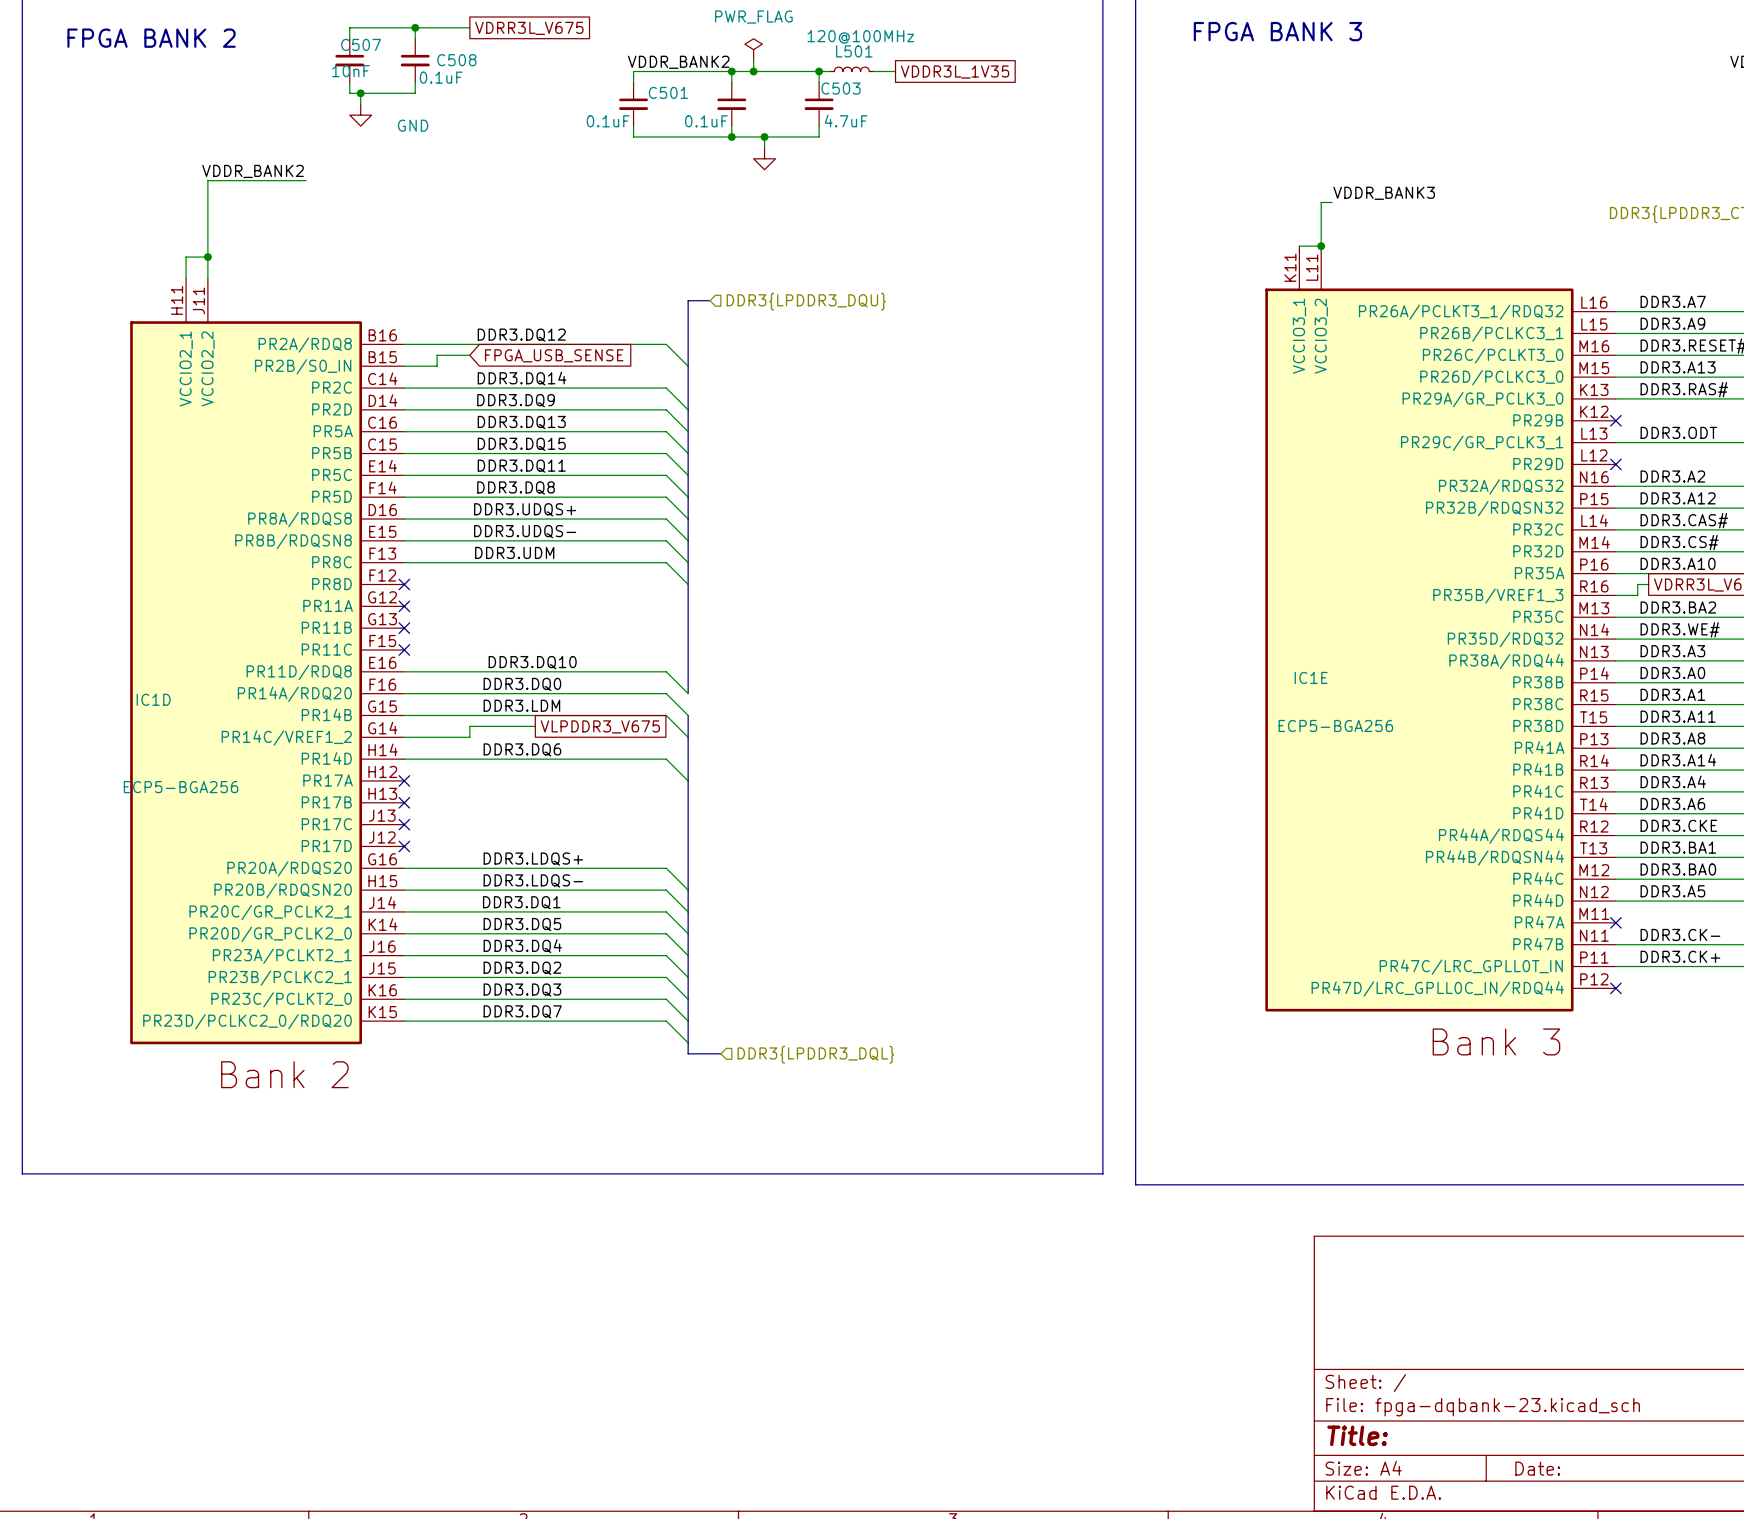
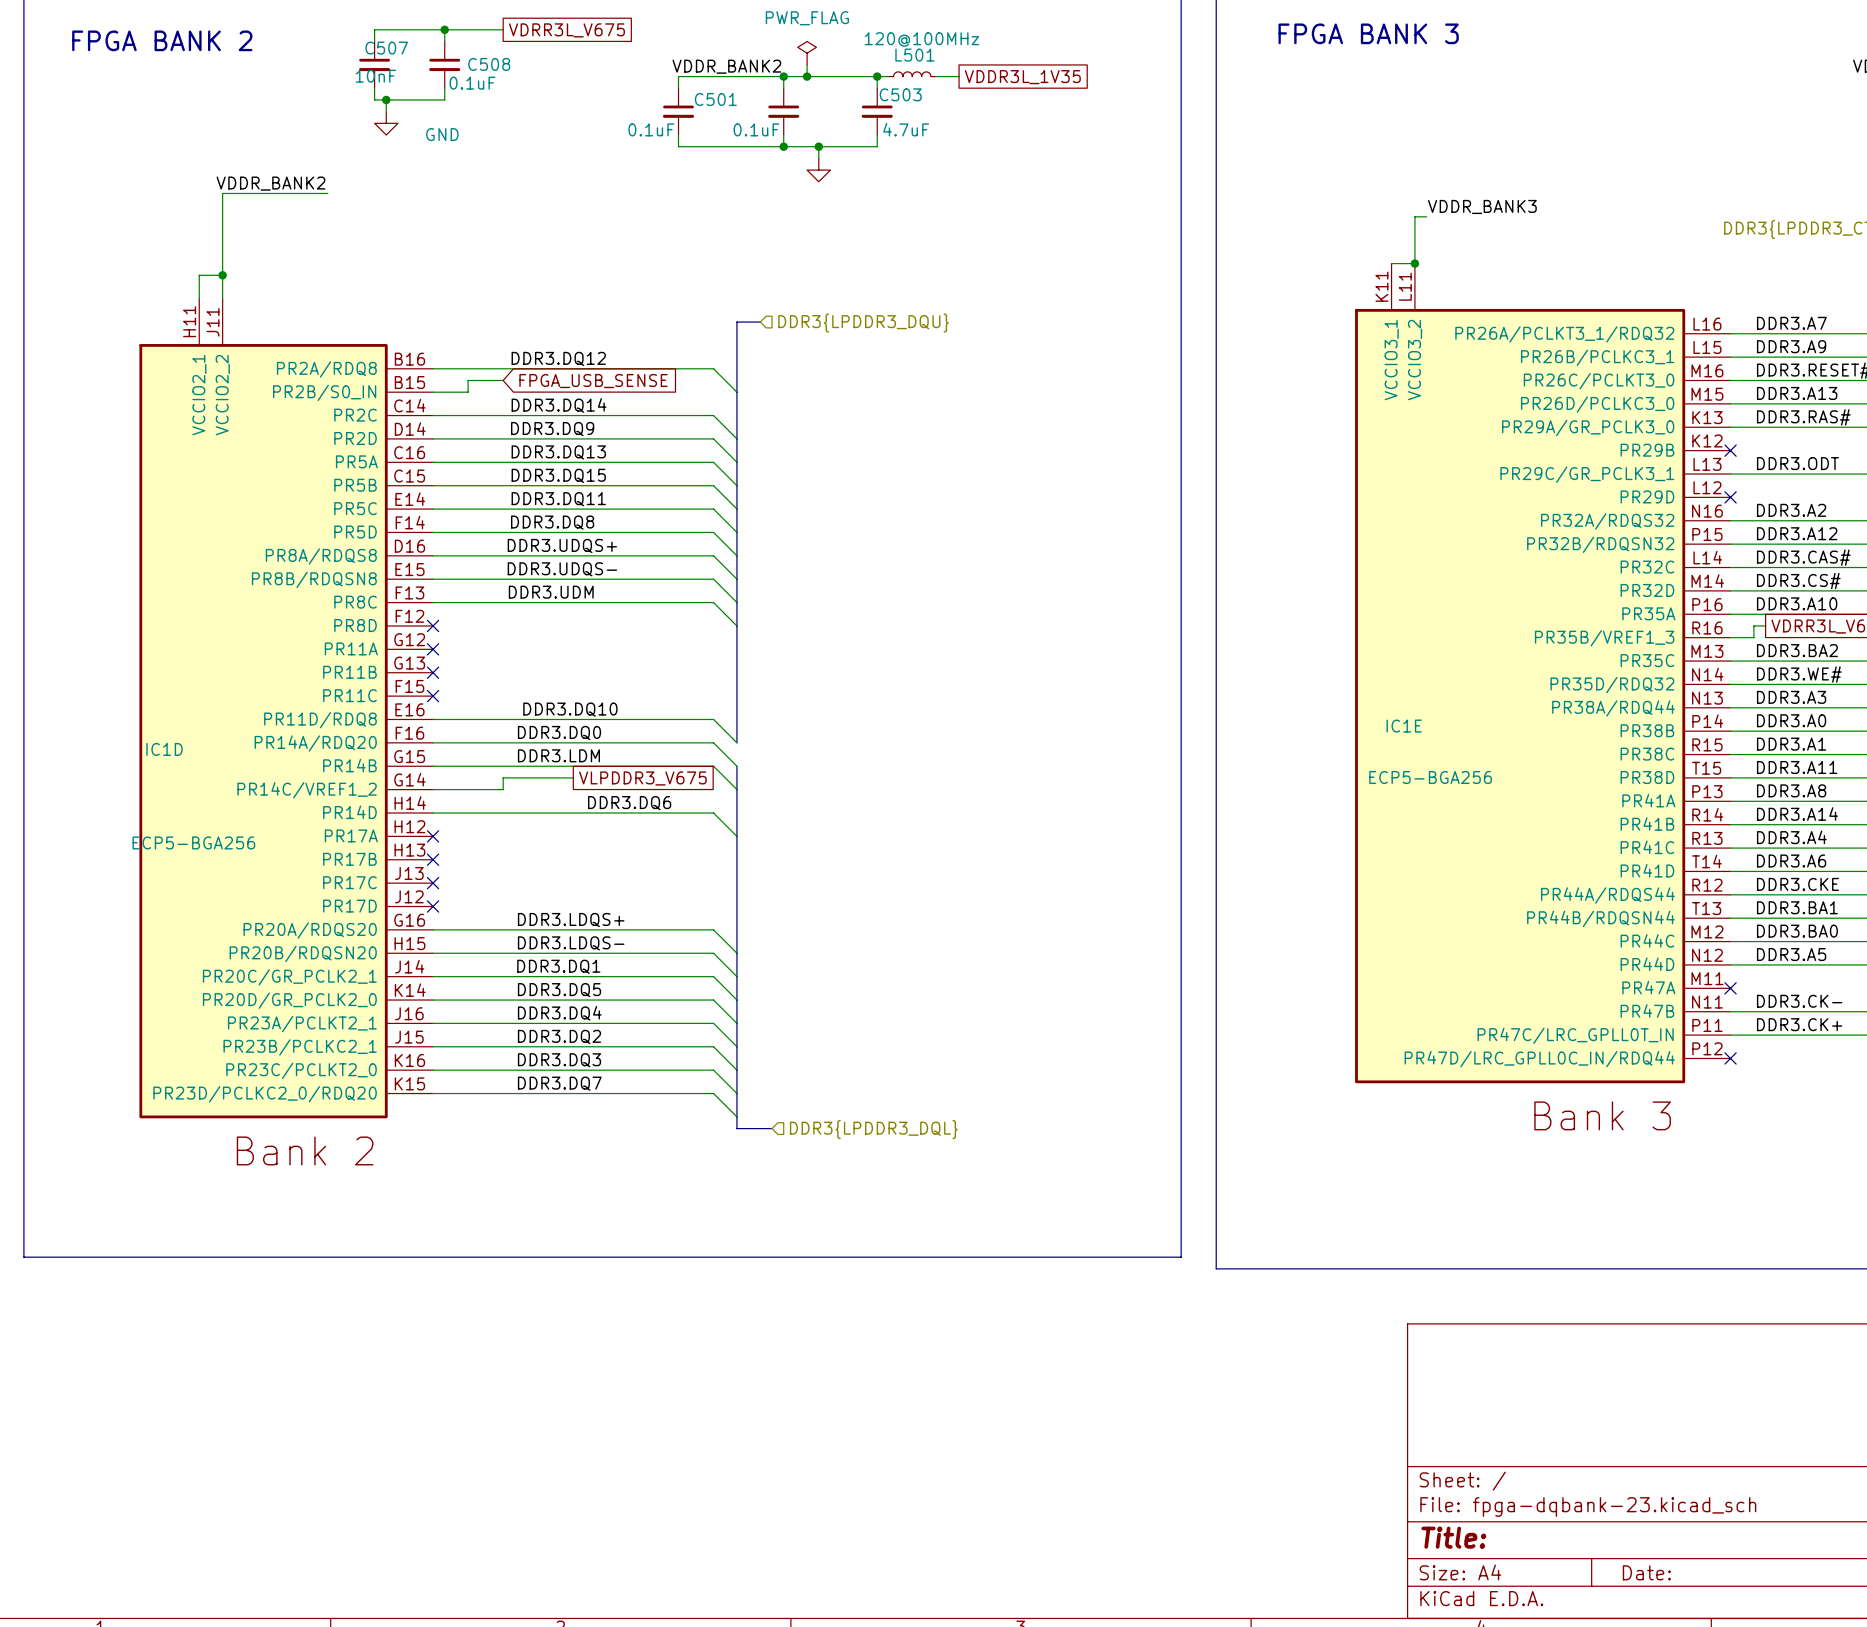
label position: DDR3.DQ6 (522, 749) -> DDR3.DQ6 (629, 803)

